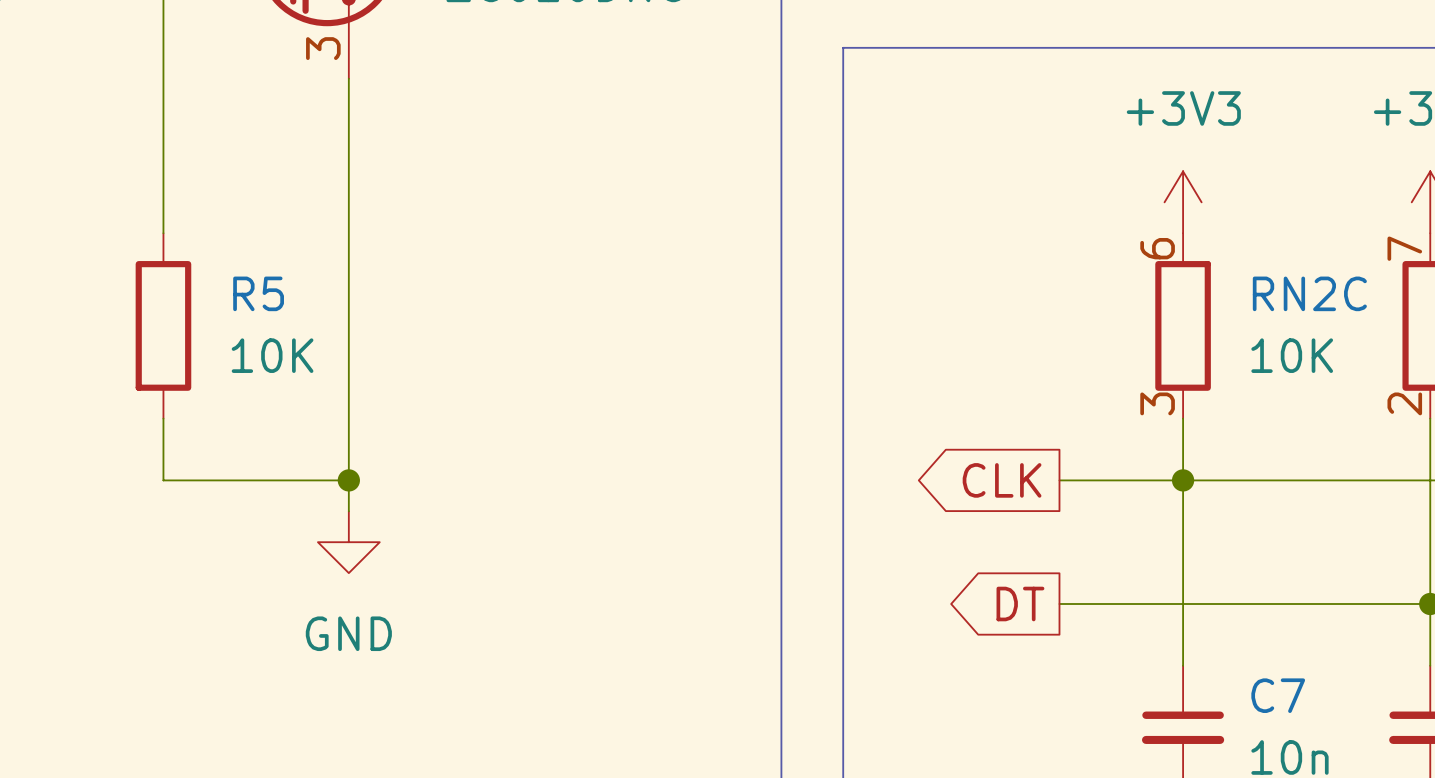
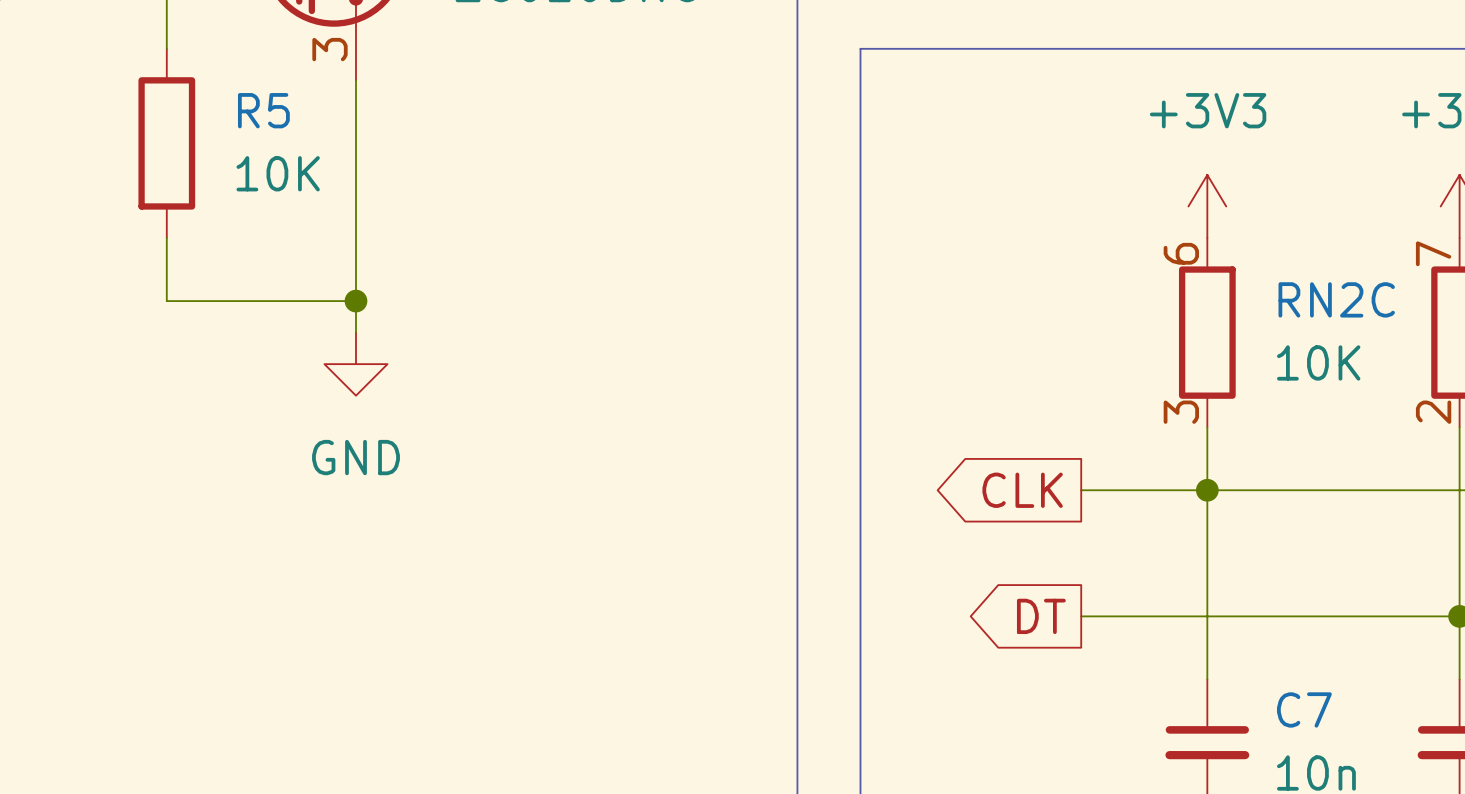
wire: (163, 47) (163, 233) -> (355, 301) (166, 301) (166, 238)
junction: none -> (355, 301)
R5 position: (163, 325) -> (166, 143)
wire: (348, 325) (348, 511) -> none
wire: (163, 418) (163, 480) (348, 480) -> none
junction: (348, 480) -> none
power symbol position: GND (348, 542) -> GND (355, 364)

